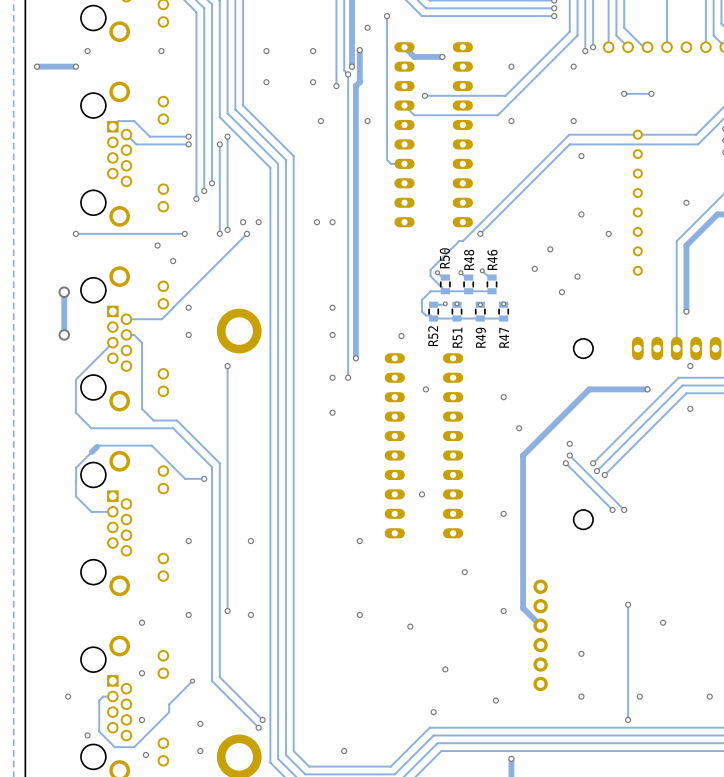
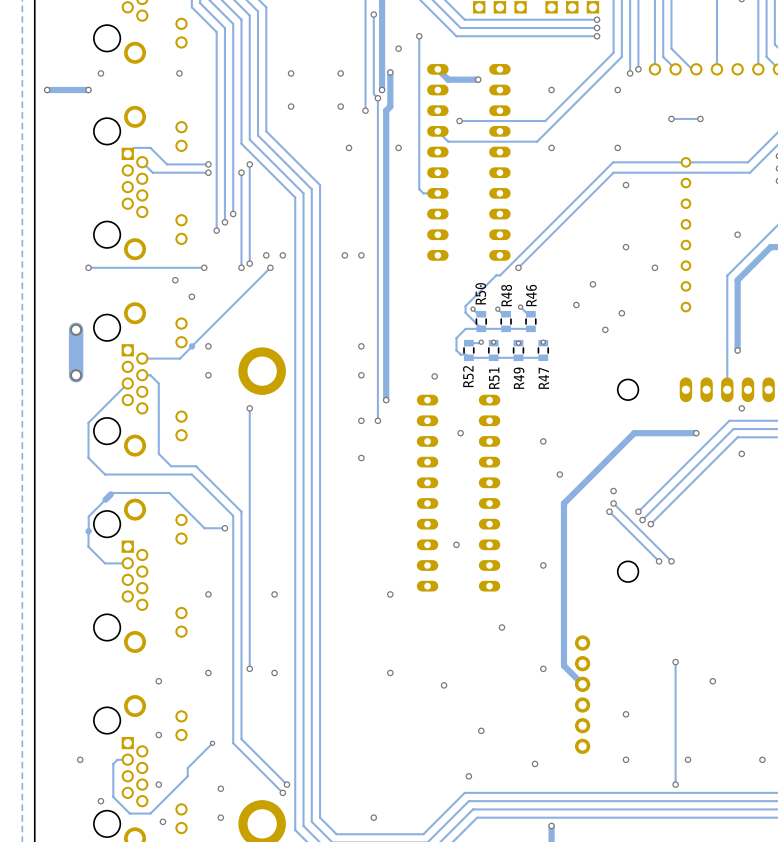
track width: thin (64, 292) (64, 334) -> thick (76, 329) (76, 375)

